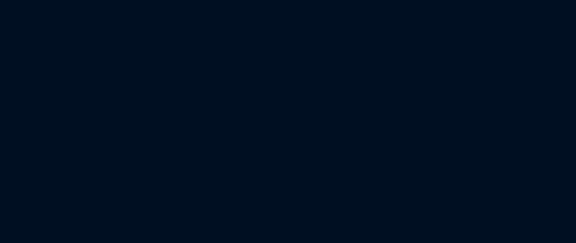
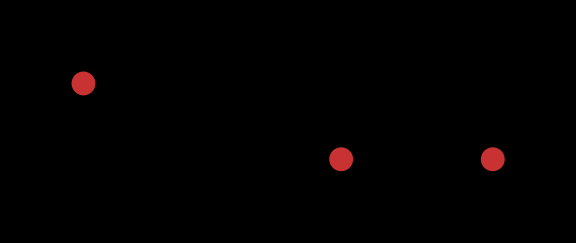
part: none -> (83, 83)
part: none -> (341, 159)
part: none -> (492, 159)

